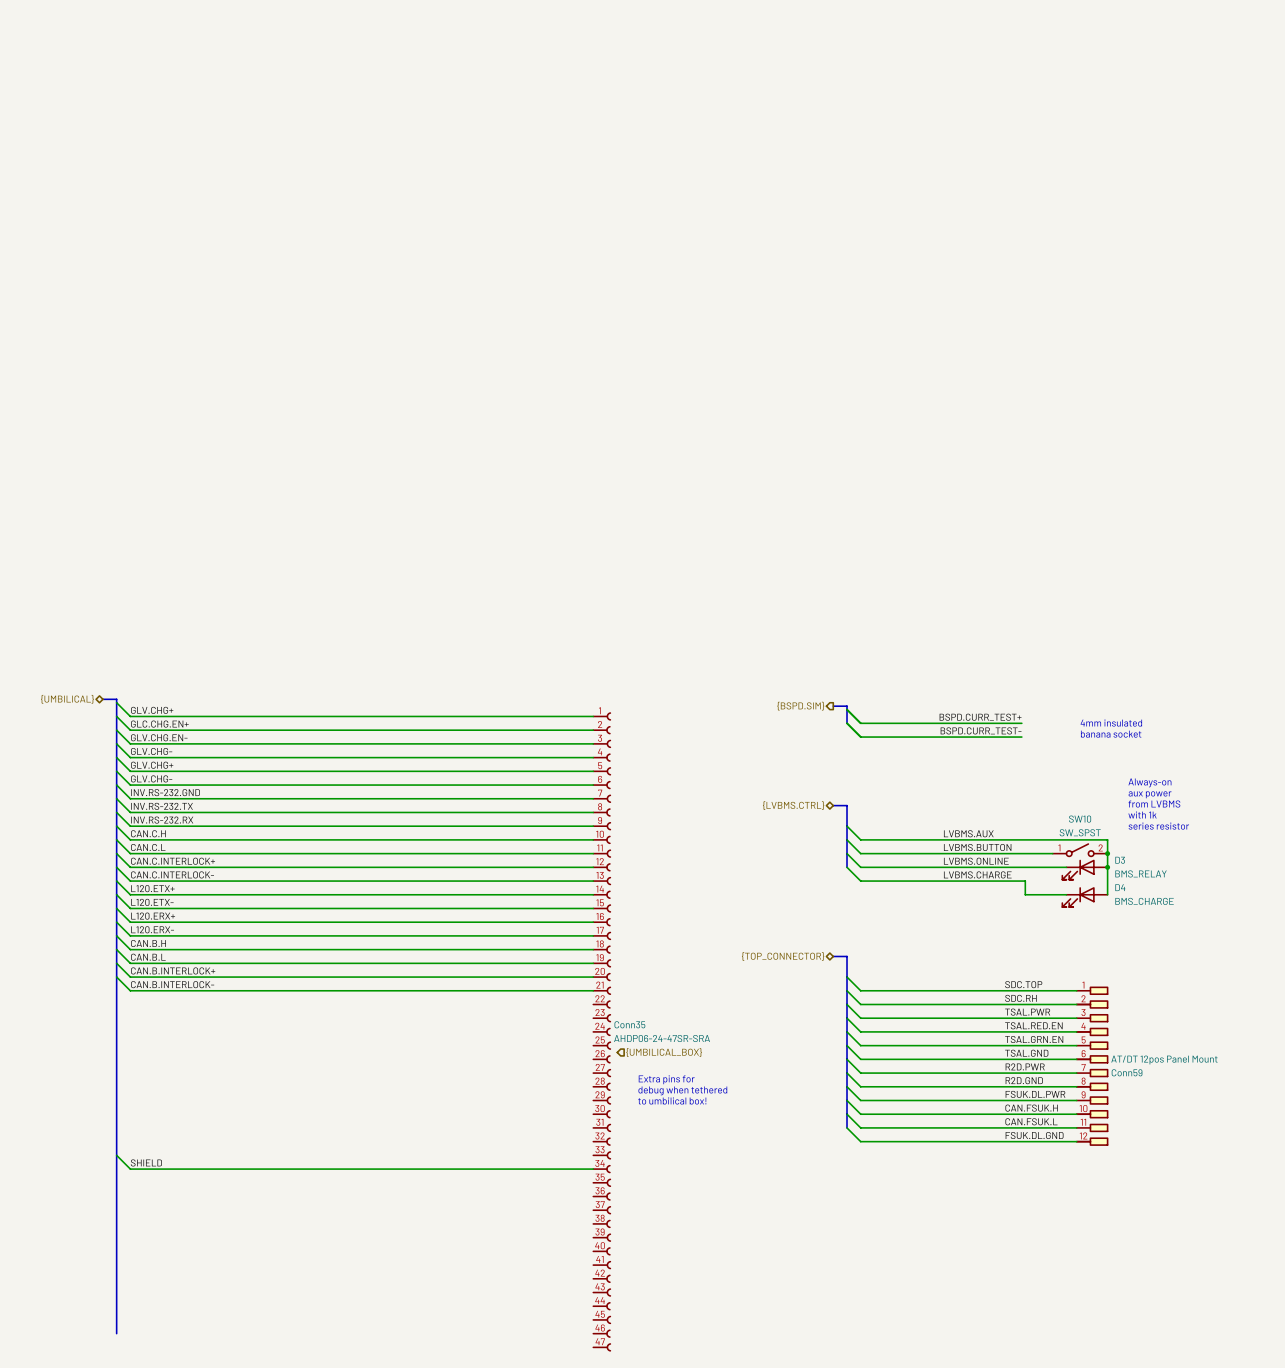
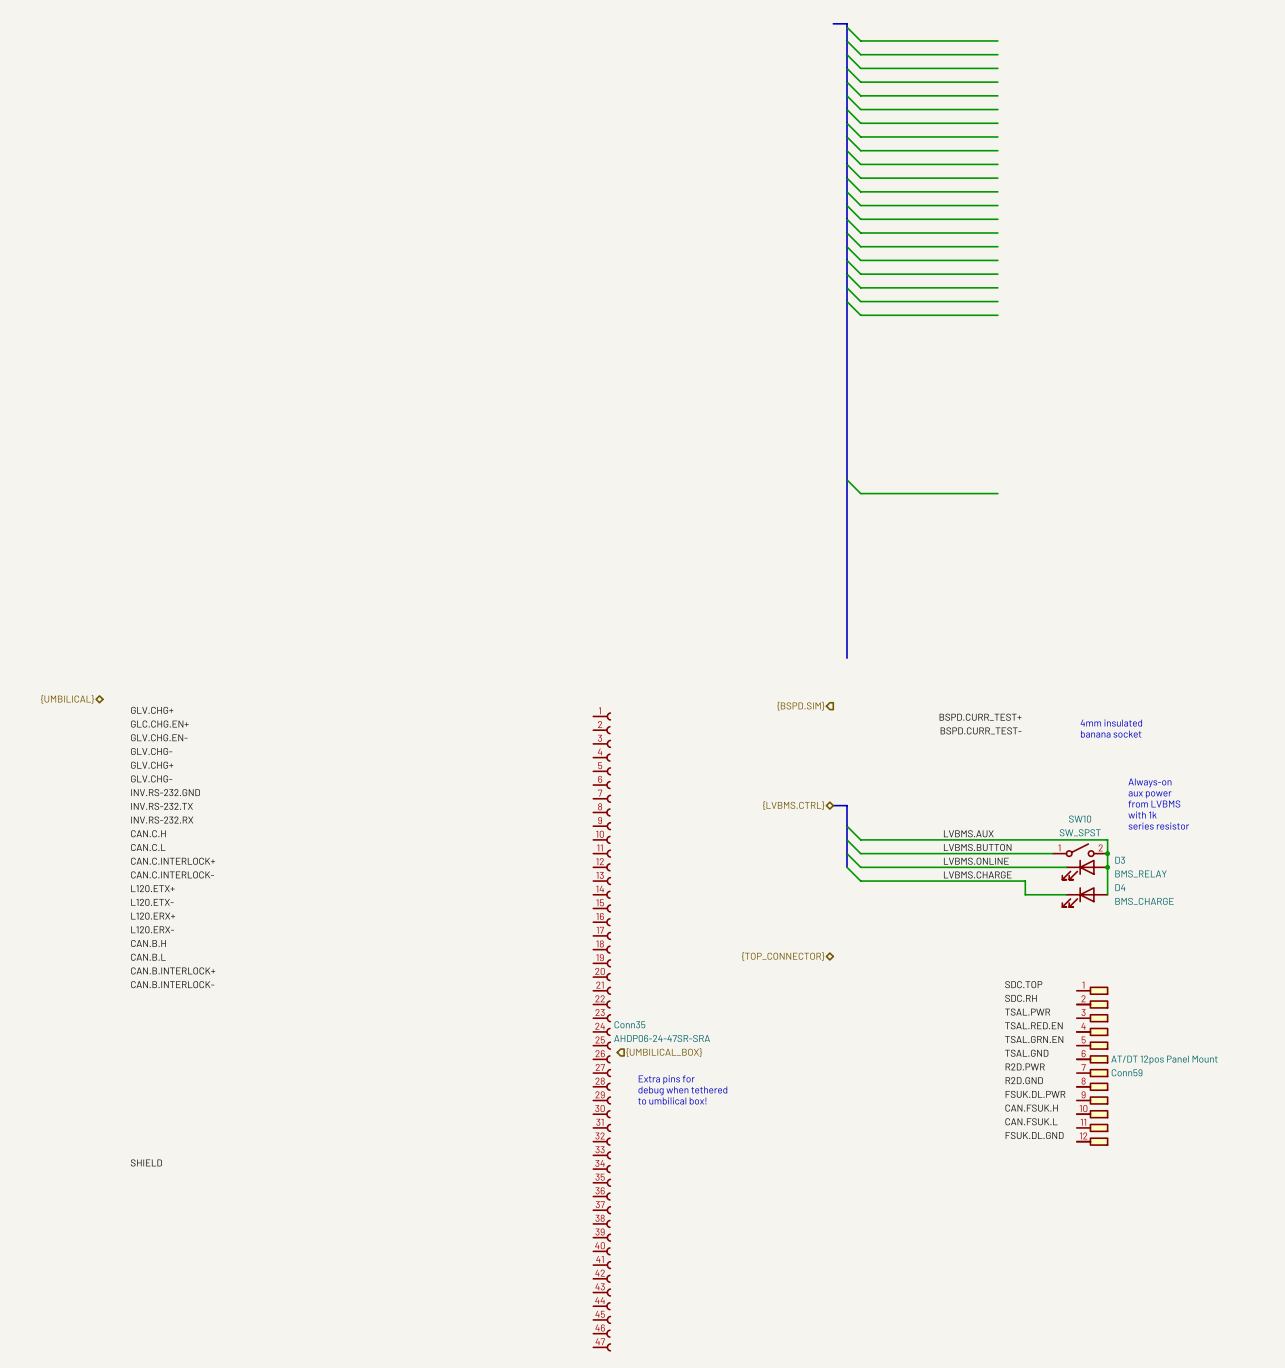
bus: none -> (833, 23) (847, 23) (847, 658)
wire: none -> (847, 27) (860, 40) (997, 40)
wire: none -> (847, 40) (860, 54) (997, 54)
wire: none -> (847, 54) (860, 68) (997, 68)
wire: none -> (847, 68) (860, 82) (997, 82)
wire: none -> (847, 82) (860, 95) (997, 95)
wire: none -> (847, 95) (860, 109) (997, 109)
wire: none -> (847, 109) (860, 123) (997, 123)
wire: none -> (847, 123) (860, 136) (997, 136)
wire: none -> (847, 136) (860, 150) (997, 150)
wire: none -> (847, 150) (860, 164) (997, 164)
wire: none -> (847, 164) (860, 178) (997, 178)
wire: none -> (847, 178) (860, 191) (997, 191)
wire: none -> (847, 191) (860, 205) (997, 205)
wire: none -> (847, 205) (860, 219) (997, 219)
wire: none -> (847, 219) (860, 232) (997, 232)
wire: none -> (847, 232) (860, 246) (997, 246)
wire: none -> (847, 246) (860, 260) (997, 260)
wire: none -> (847, 260) (860, 274) (997, 274)
wire: none -> (847, 274) (860, 287) (997, 287)
wire: none -> (847, 287) (860, 301) (997, 301)
wire: none -> (847, 301) (860, 315) (997, 315)
wire: none -> (847, 479) (860, 493) (997, 493)
bus: (102, 699) (116, 699) (116, 1333) -> none
wire: (116, 702) (130, 716) (593, 716) -> none
bus: (833, 706) (847, 706) (847, 723) -> none
wire: (847, 709) (860, 723) (1021, 723) -> none
wire: (116, 716) (130, 730) (593, 730) -> none
wire: (847, 723) (860, 737) (1021, 737) -> none
wire: (116, 730) (130, 743) (593, 743) -> none
wire: (116, 743) (130, 757) (593, 757) -> none
wire: (116, 757) (130, 771) (593, 771) -> none
wire: (116, 771) (130, 785) (593, 785) -> none
wire: (116, 785) (130, 798) (593, 798) -> none
wire: (116, 798) (130, 812) (593, 812) -> none
wire: (116, 812) (130, 826) (593, 826) -> none
wire: (116, 826) (130, 839) (593, 839) -> none
wire: (116, 839) (130, 853) (593, 853) -> none
wire: (116, 853) (130, 867) (593, 867) -> none
wire: (116, 867) (130, 881) (593, 881) -> none
wire: (116, 881) (130, 894) (593, 894) -> none
wire: (116, 894) (130, 908) (593, 908) -> none
wire: (116, 908) (130, 922) (593, 922) -> none
wire: (116, 922) (130, 935) (593, 935) -> none
wire: (116, 935) (130, 949) (593, 949) -> none
wire: (116, 949) (130, 963) (593, 963) -> none
bus: (833, 956) (847, 956) (847, 1127) -> none
wire: (116, 963) (130, 977) (593, 977) -> none
wire: (116, 977) (130, 990) (593, 990) -> none
wire: (847, 977) (860, 990) (1076, 990) -> none
wire: (847, 990) (860, 1004) (1076, 1004) -> none
wire: (847, 1004) (860, 1018) (1076, 1018) -> none
wire: (847, 1018) (860, 1031) (1076, 1031) -> none
wire: (847, 1031) (860, 1045) (1076, 1045) -> none
wire: (847, 1045) (860, 1059) (1076, 1059) -> none
wire: (847, 1059) (860, 1073) (1076, 1073) -> none
wire: (847, 1073) (860, 1086) (1076, 1086) -> none
wire: (847, 1086) (860, 1100) (1076, 1100) -> none
wire: (847, 1100) (860, 1114) (1076, 1114) -> none
wire: (847, 1114) (860, 1127) (1076, 1127) -> none
wire: (847, 1127) (860, 1141) (1076, 1141) -> none
wire: (116, 1155) (130, 1169) (593, 1169) -> none

